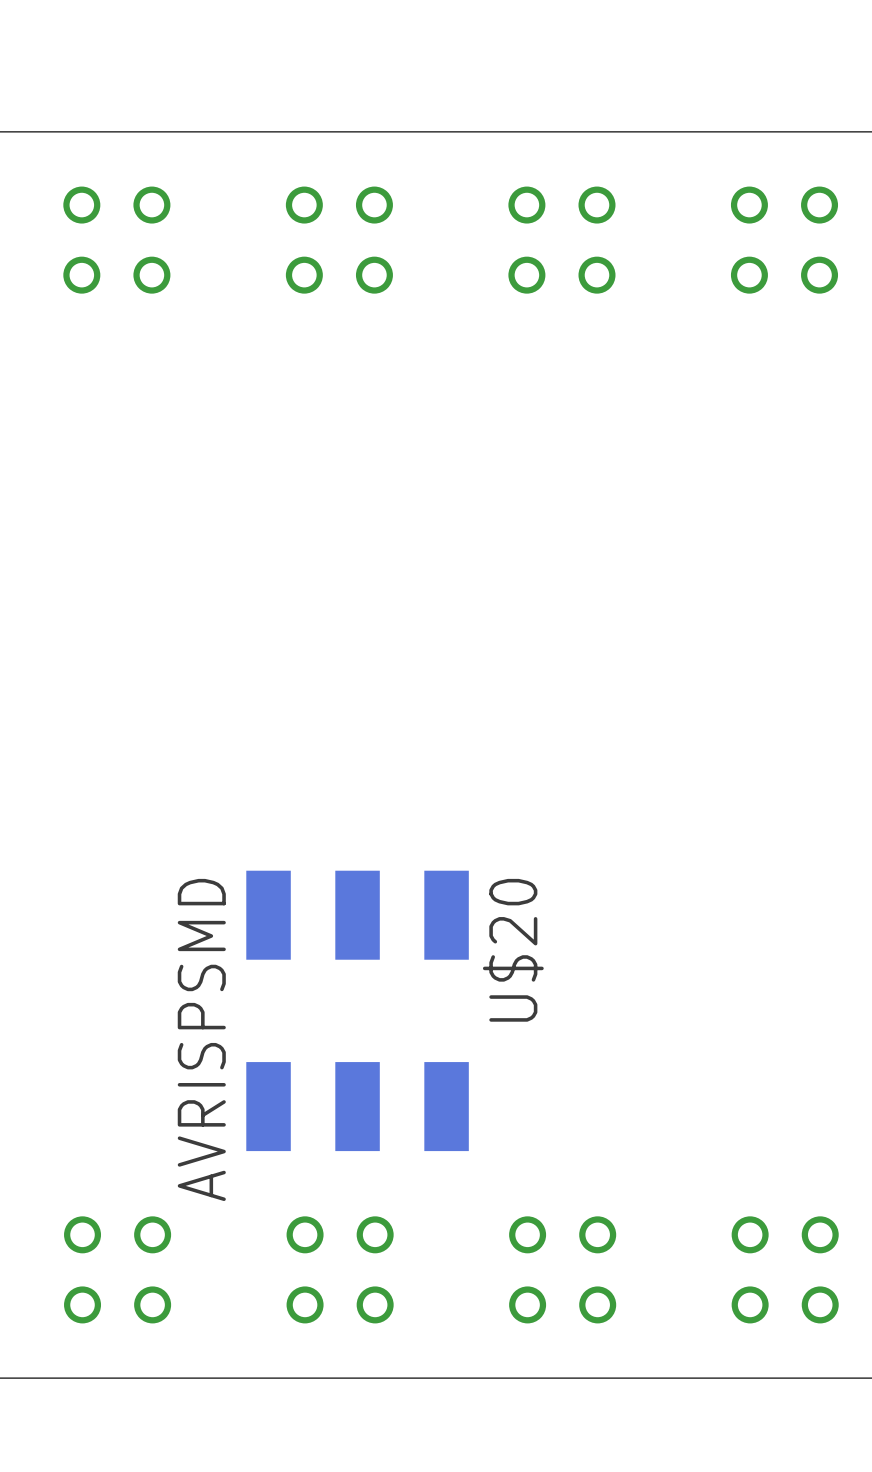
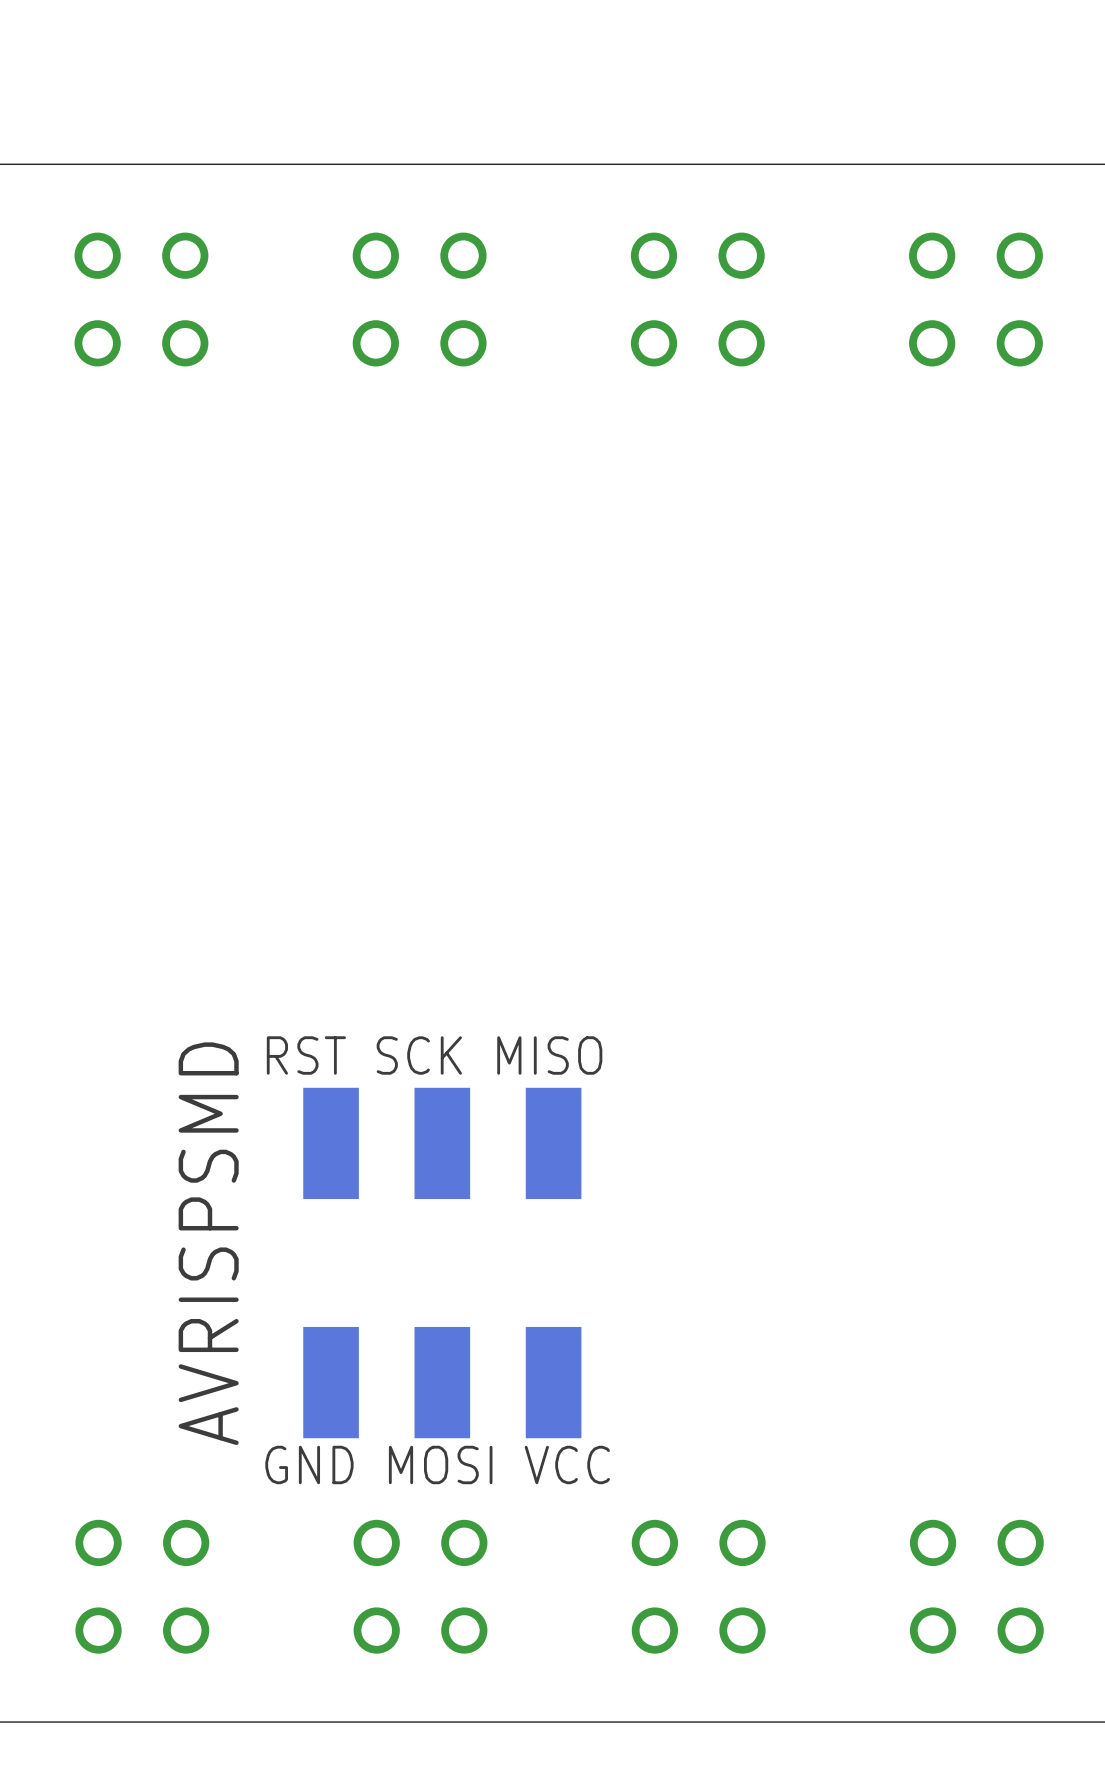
text: none -> RST SCK MISO (434, 1055)
U$20 name: U$20 (513, 950) -> none
U$20 value position: AVRISPSMD (201, 1039) -> AVRISPSMD (208, 1243)
text: none -> GND MOSI VCC (437, 1464)

